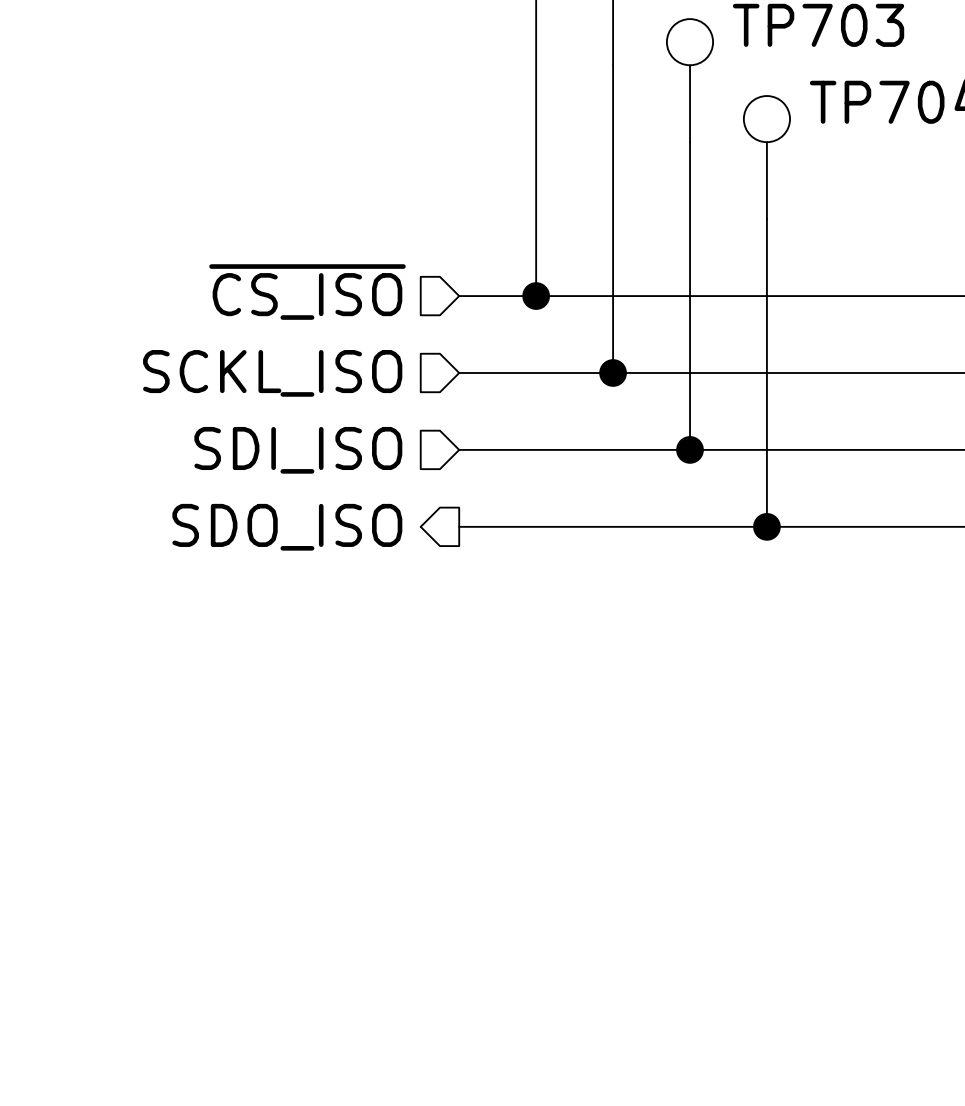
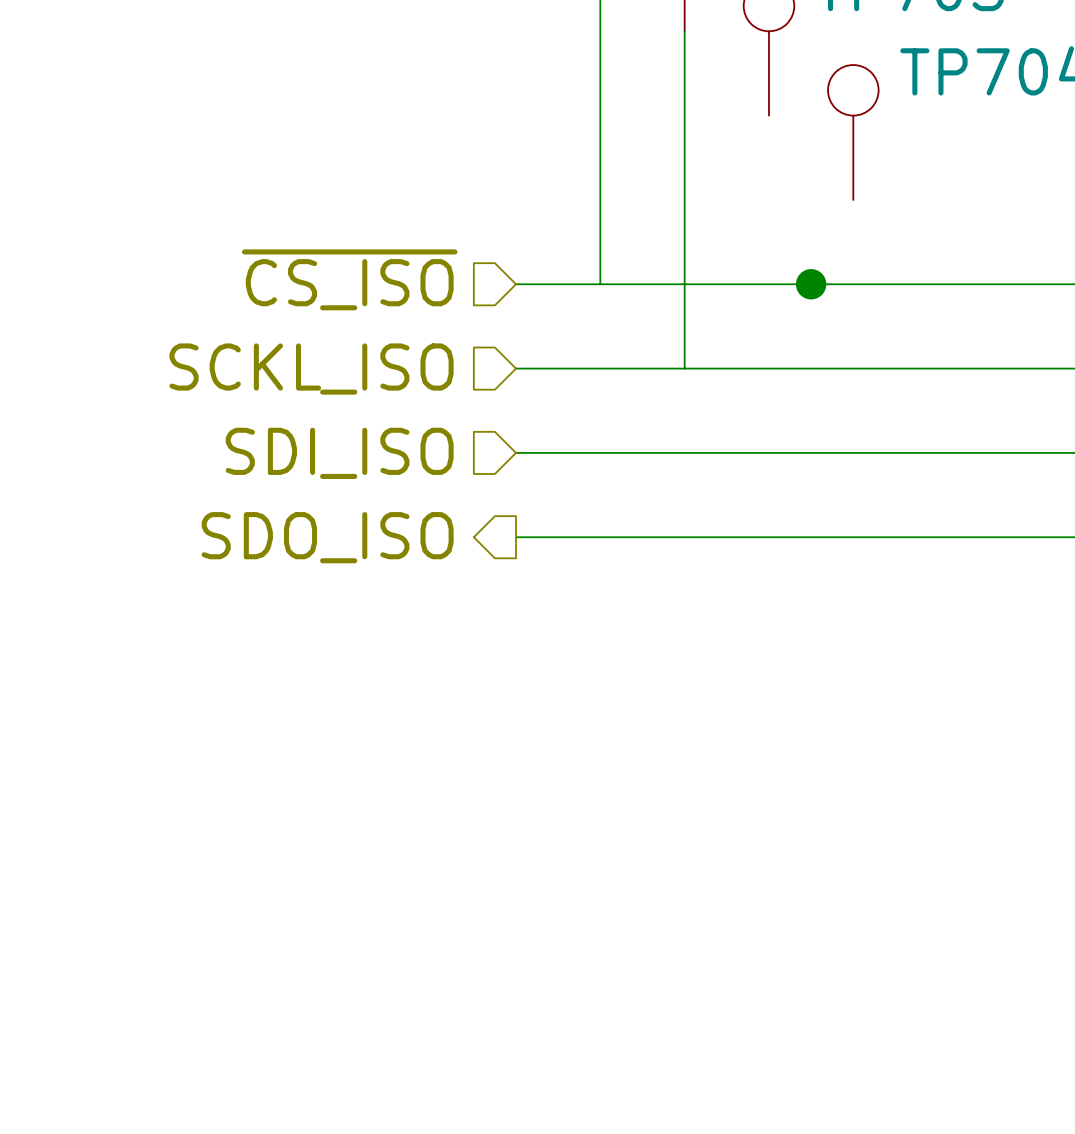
wire: (690, 142) (690, 449) -> none
wire: (766, 219) (766, 526) -> none
junction: (536, 296) -> none
junction: none -> (811, 284)
junction: (613, 372) -> none
junction: (690, 449) -> none
junction: (766, 526) -> none

